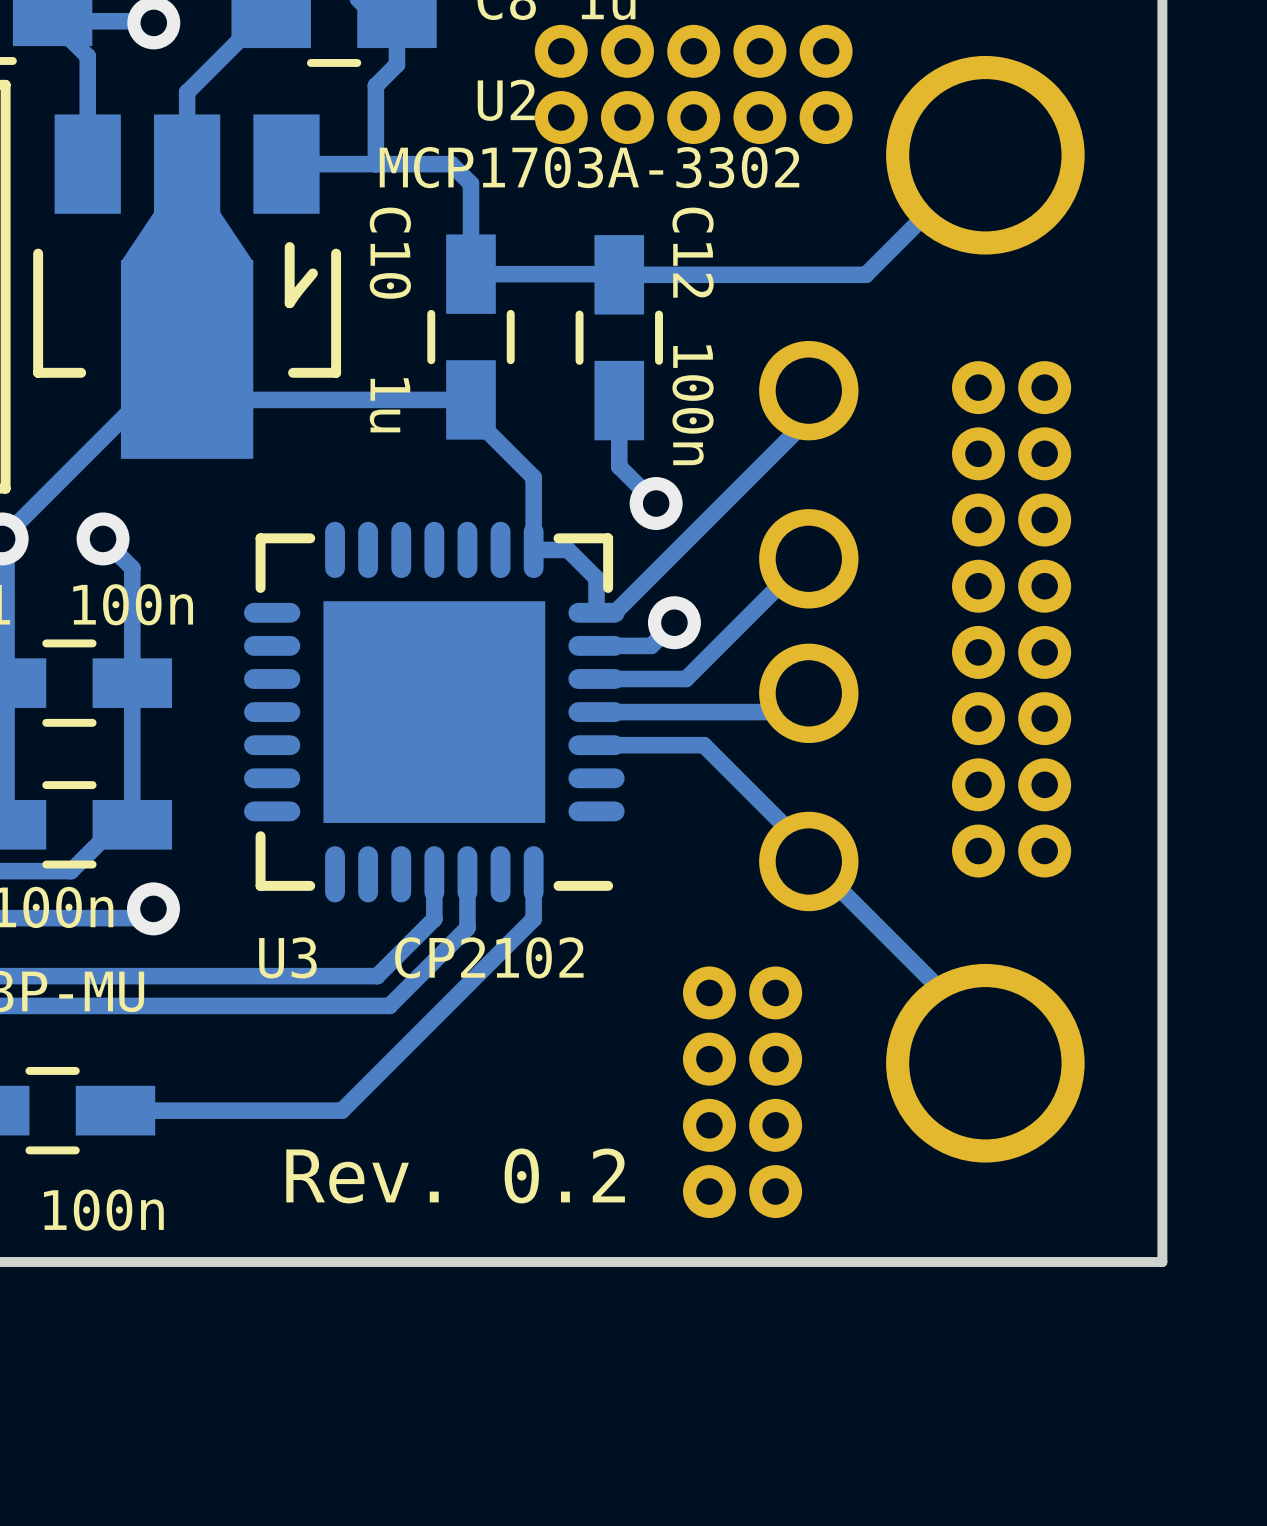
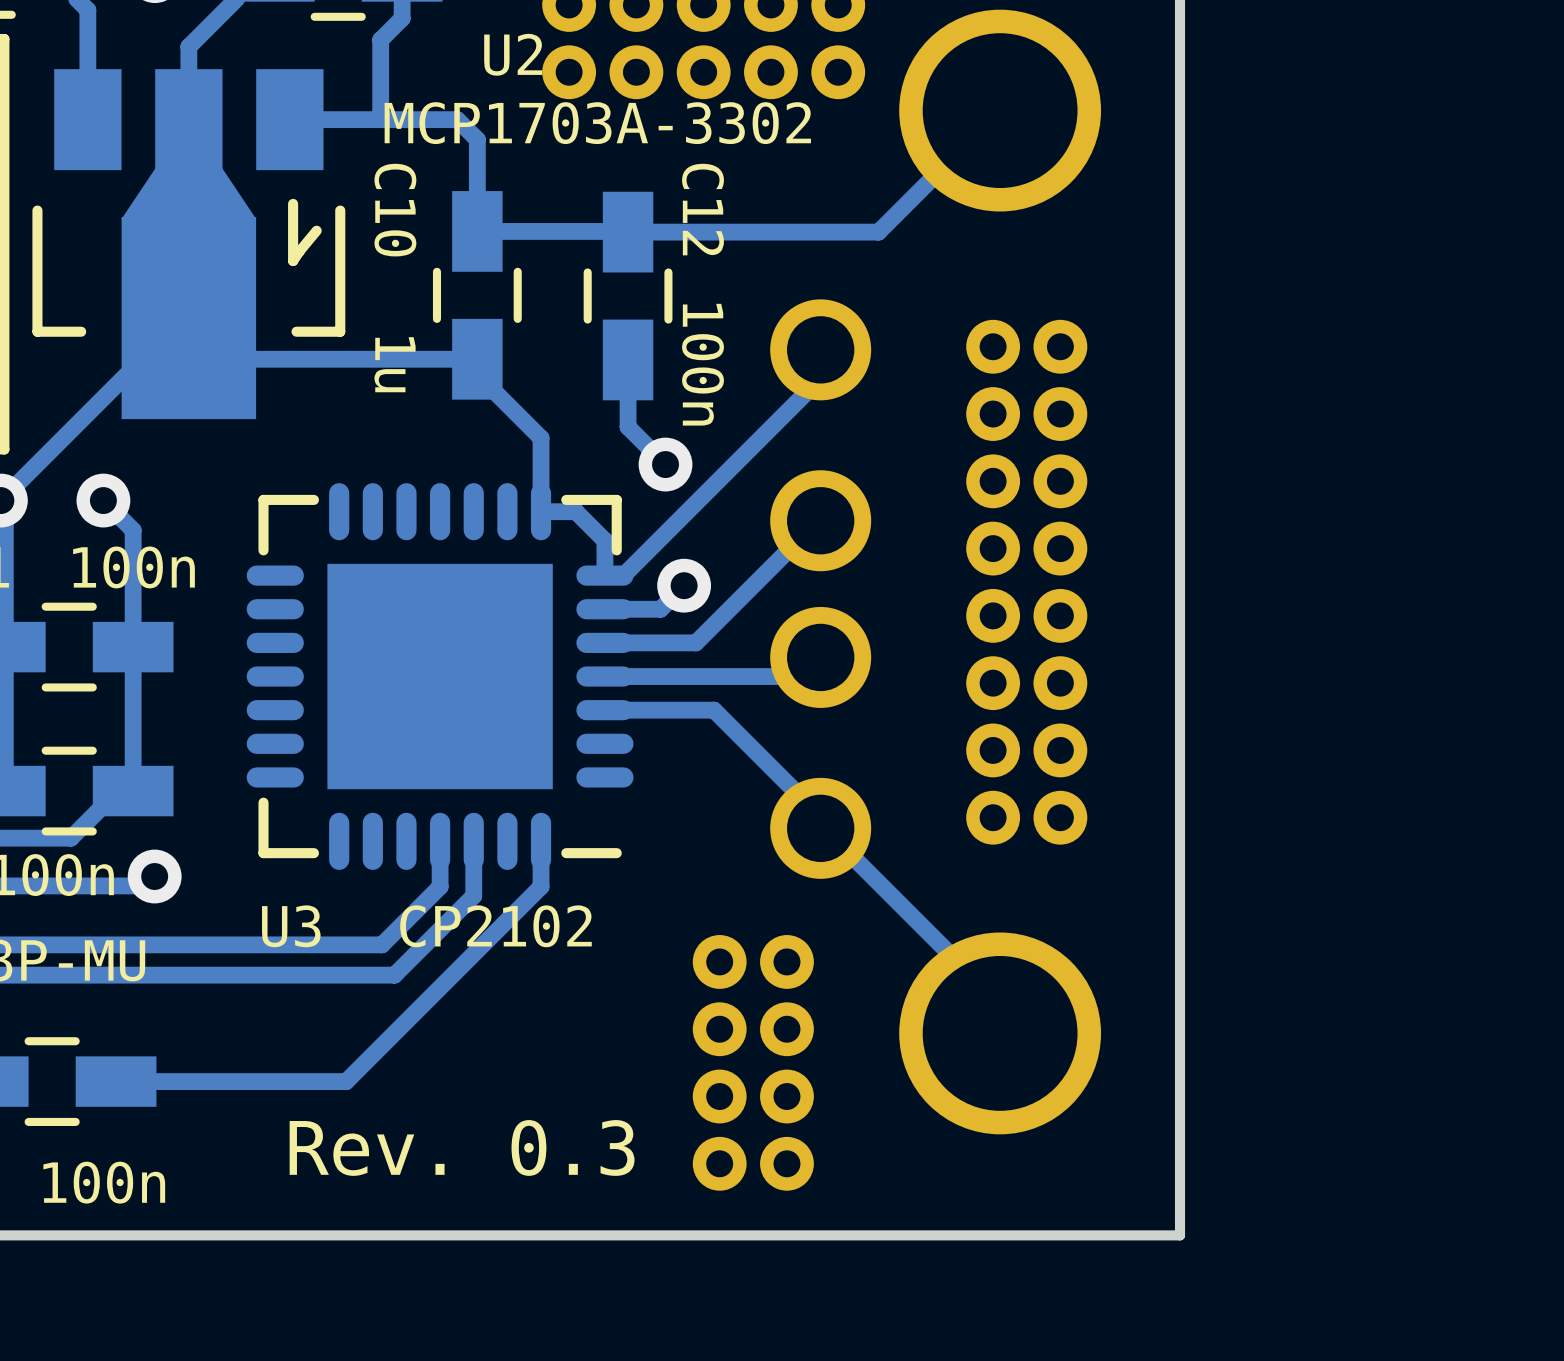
text: Rev. 0.2 (455, 1175) -> Rev. 0.3 (462, 1147)

